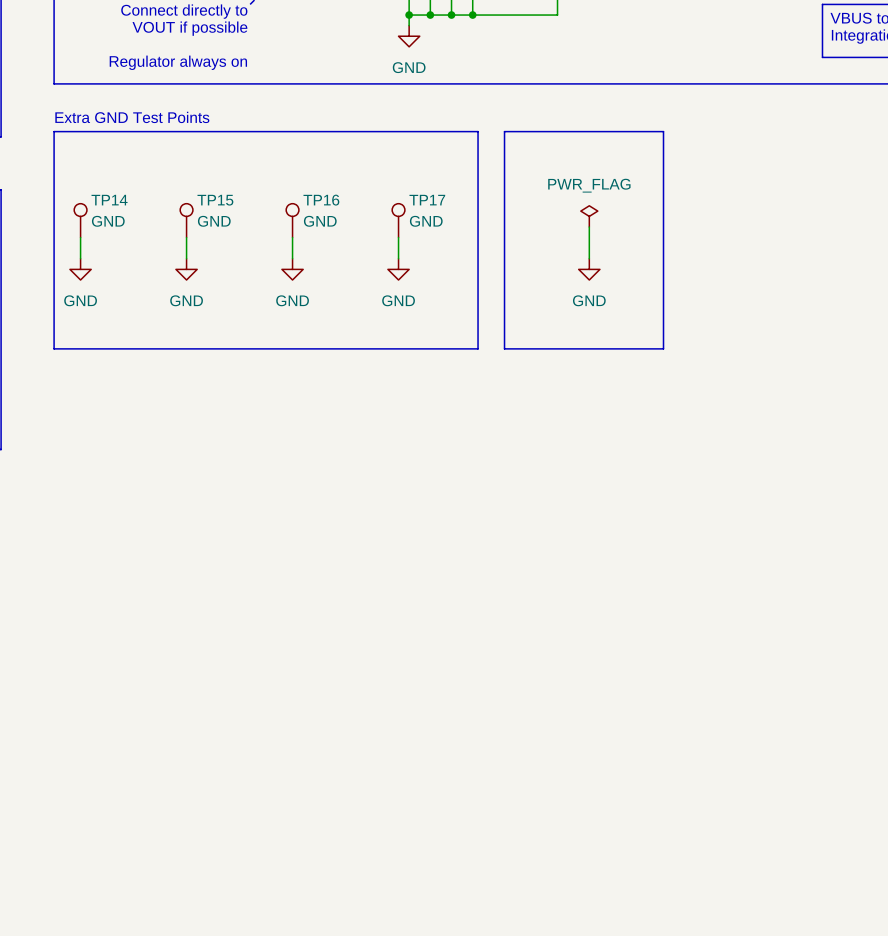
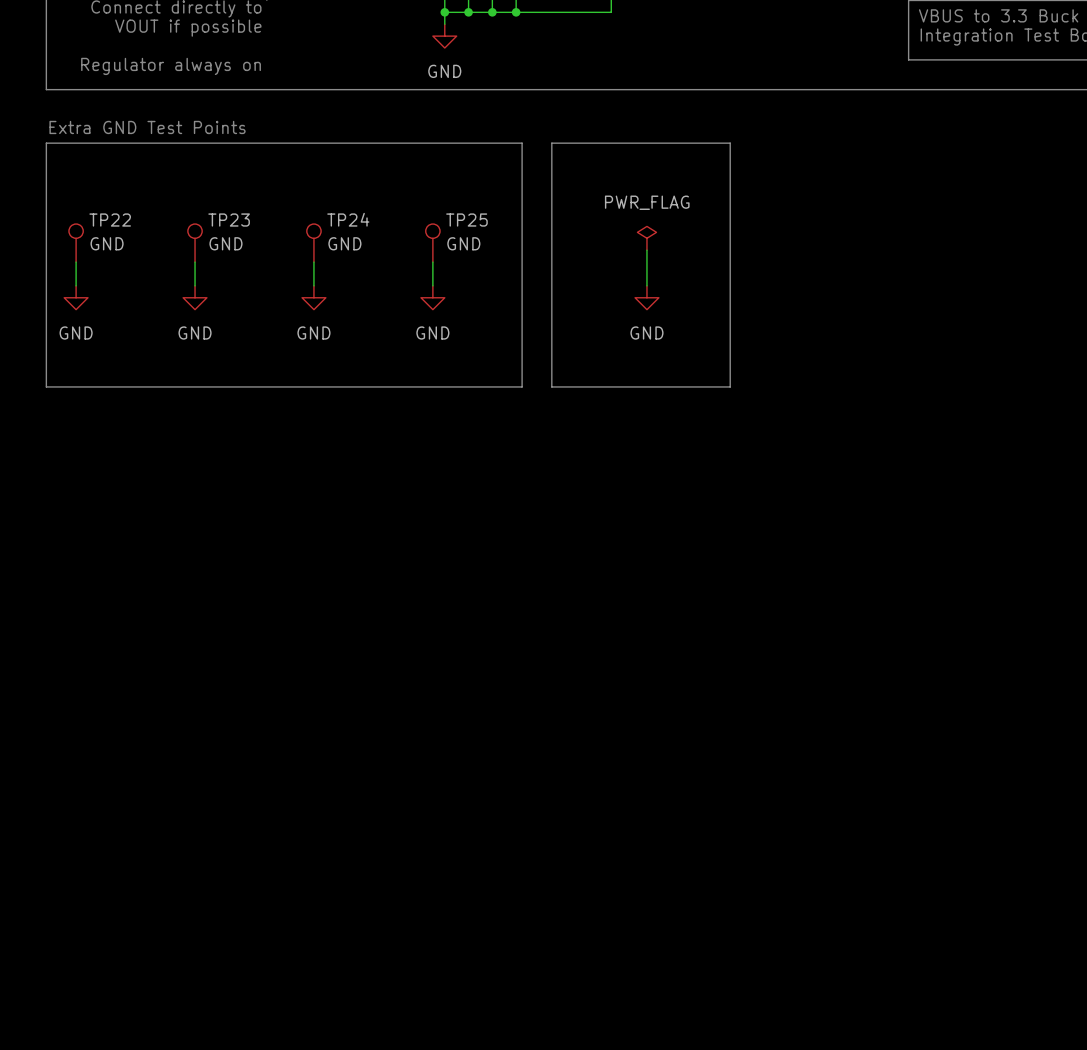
TP14 name: TP14 (109, 200) -> TP22 (110, 220)
TP15 name: TP15 (215, 200) -> TP23 (229, 220)
TP16 name: TP16 (321, 200) -> TP24 (348, 219)
TP17 name: TP17 (427, 200) -> TP25 (466, 220)

